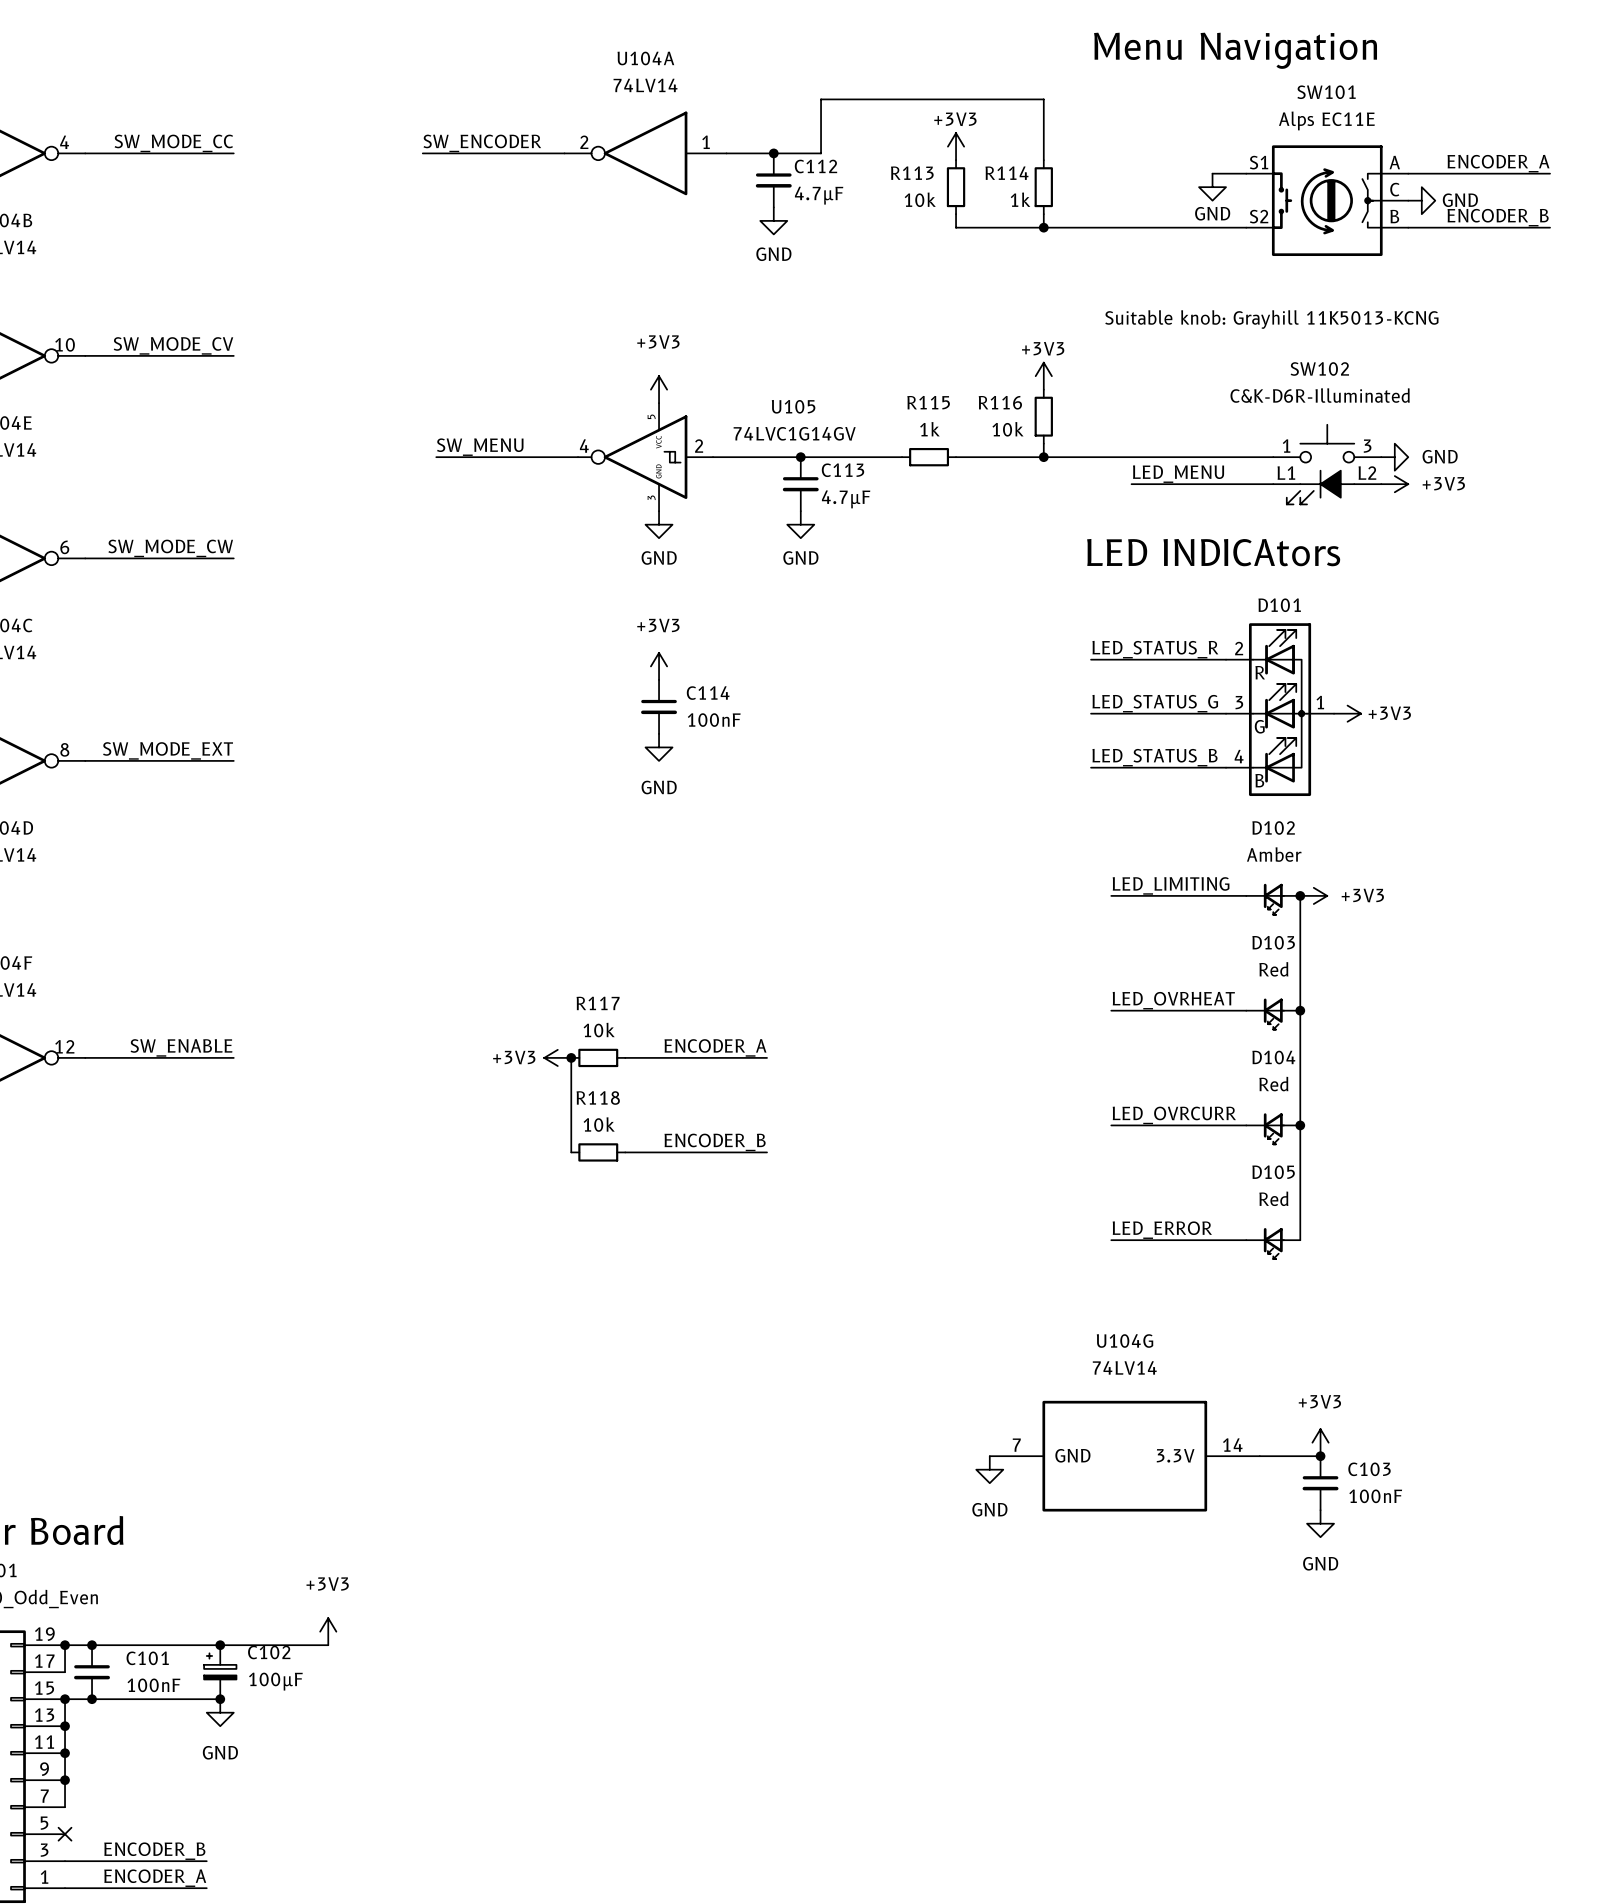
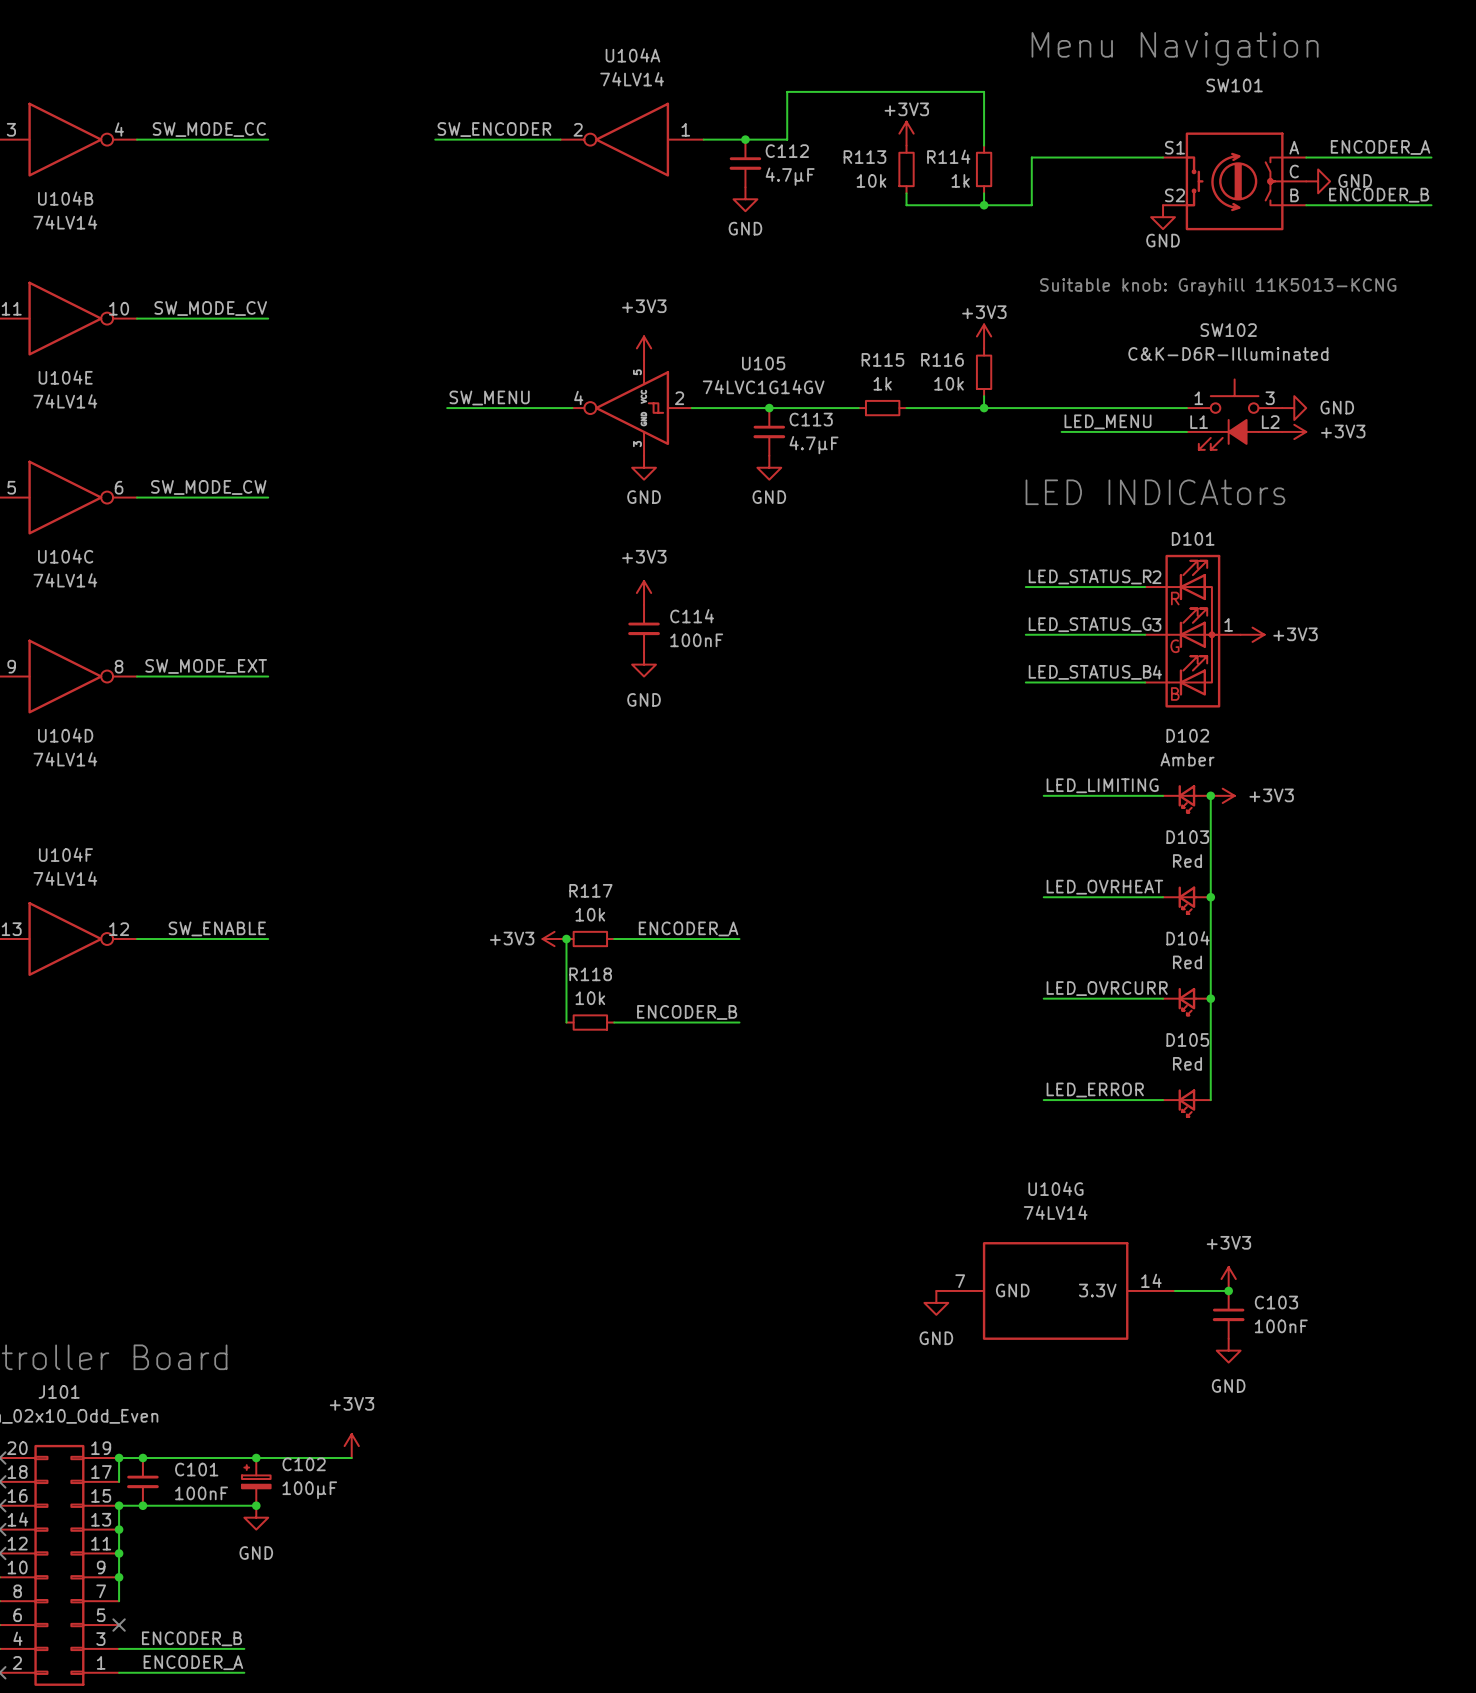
SW101 value: Alps EC11E (1326, 120) -> none
power symbol position: GND (1212, 187) -> GND (1163, 217)
wire: (1097, 227) (1246, 227) -> (1031, 205) (1031, 157) (1133, 157)

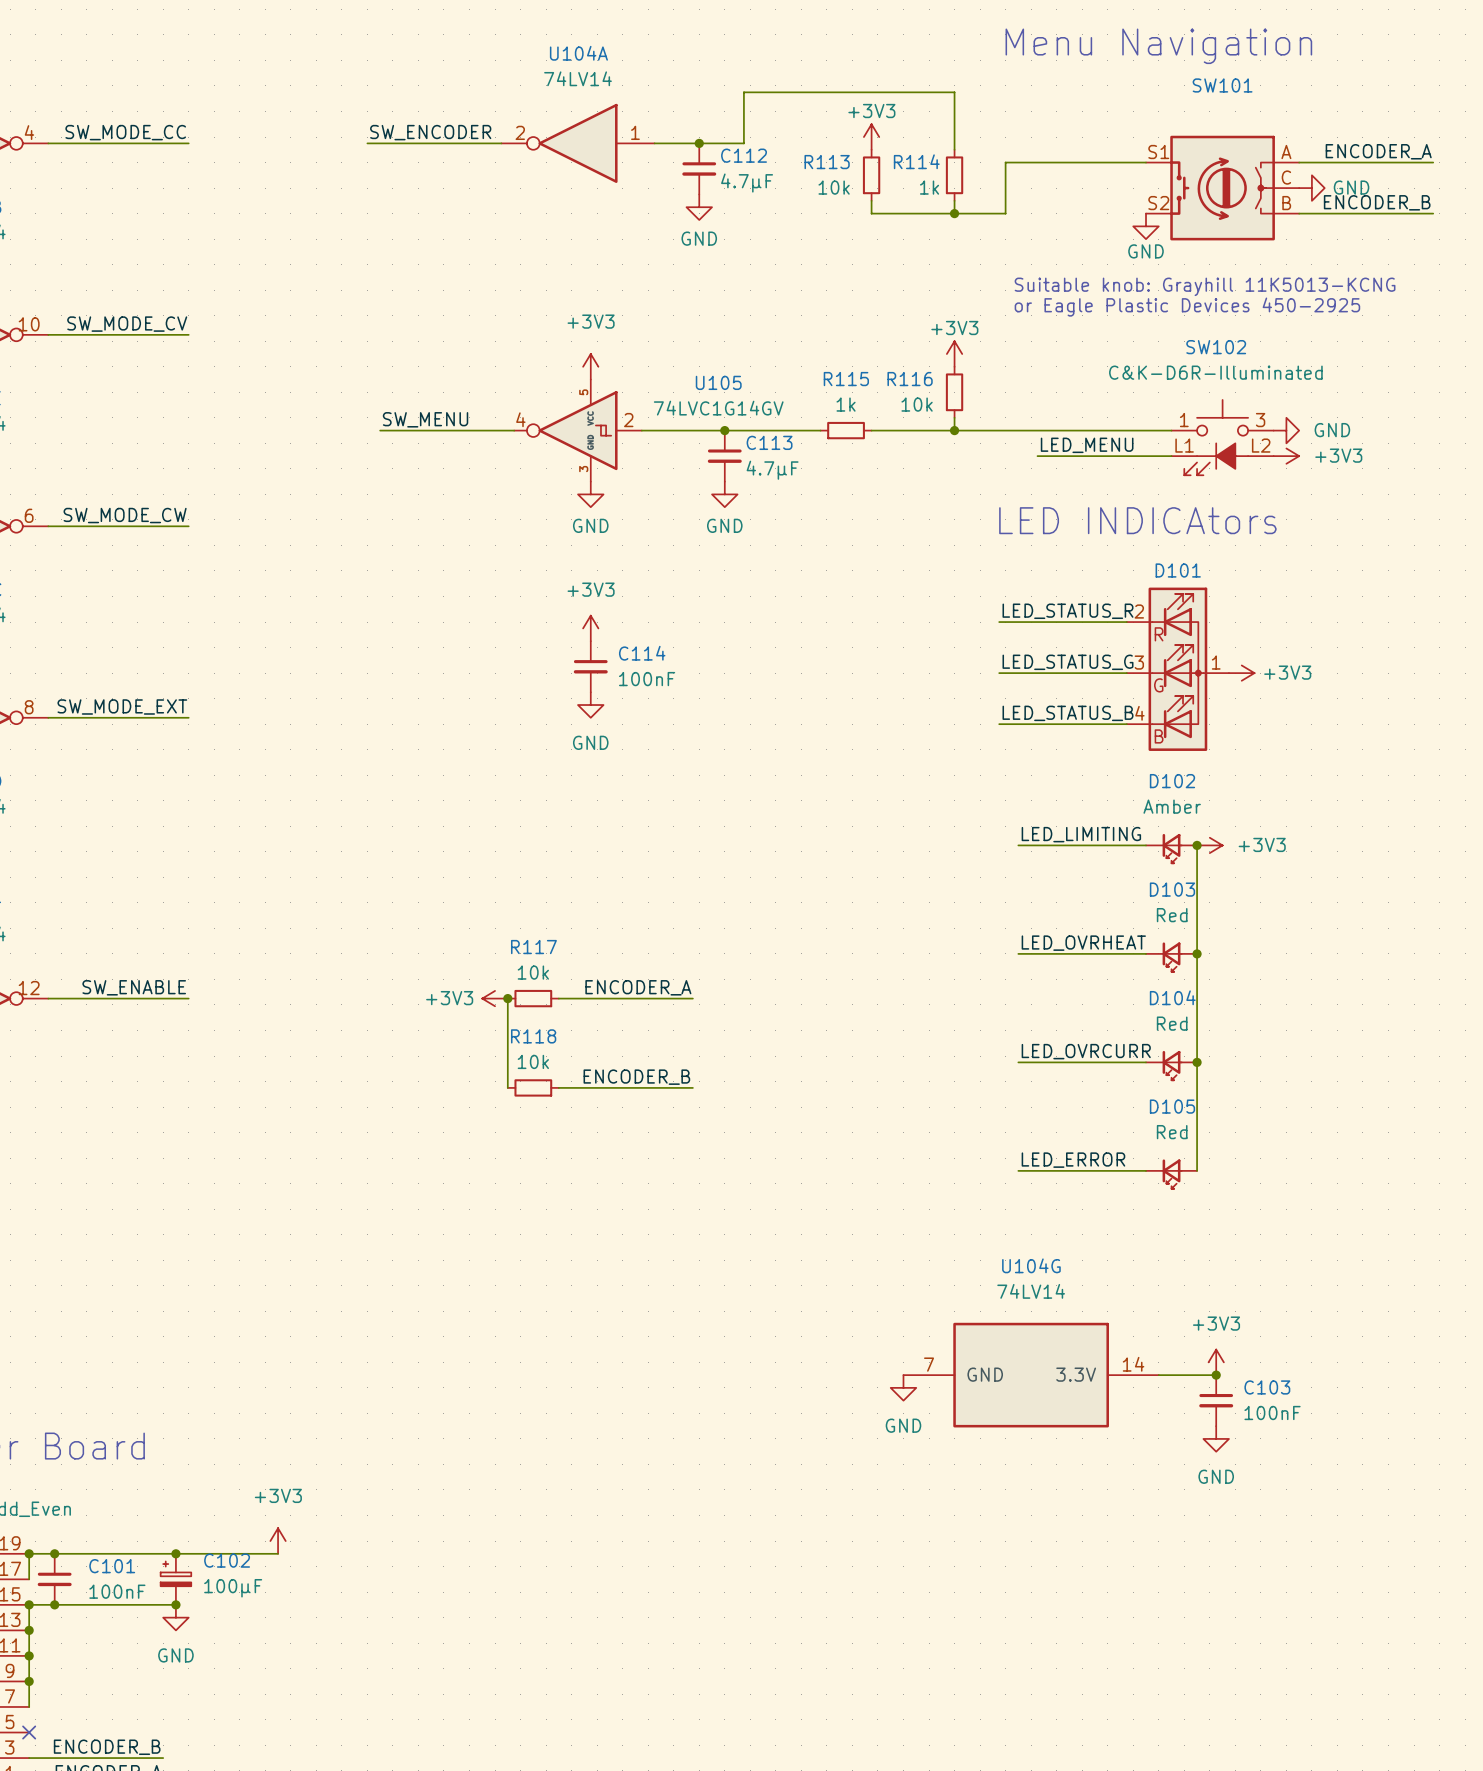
text: none -> Suitable knob: Grayhill 11K5013-KCNG (1205, 286)
text: Suitable knob: Grayhill 11K5013-KCNG (1218, 286) -> or Eagle Plastic Devices 450-2925 (1187, 307)

